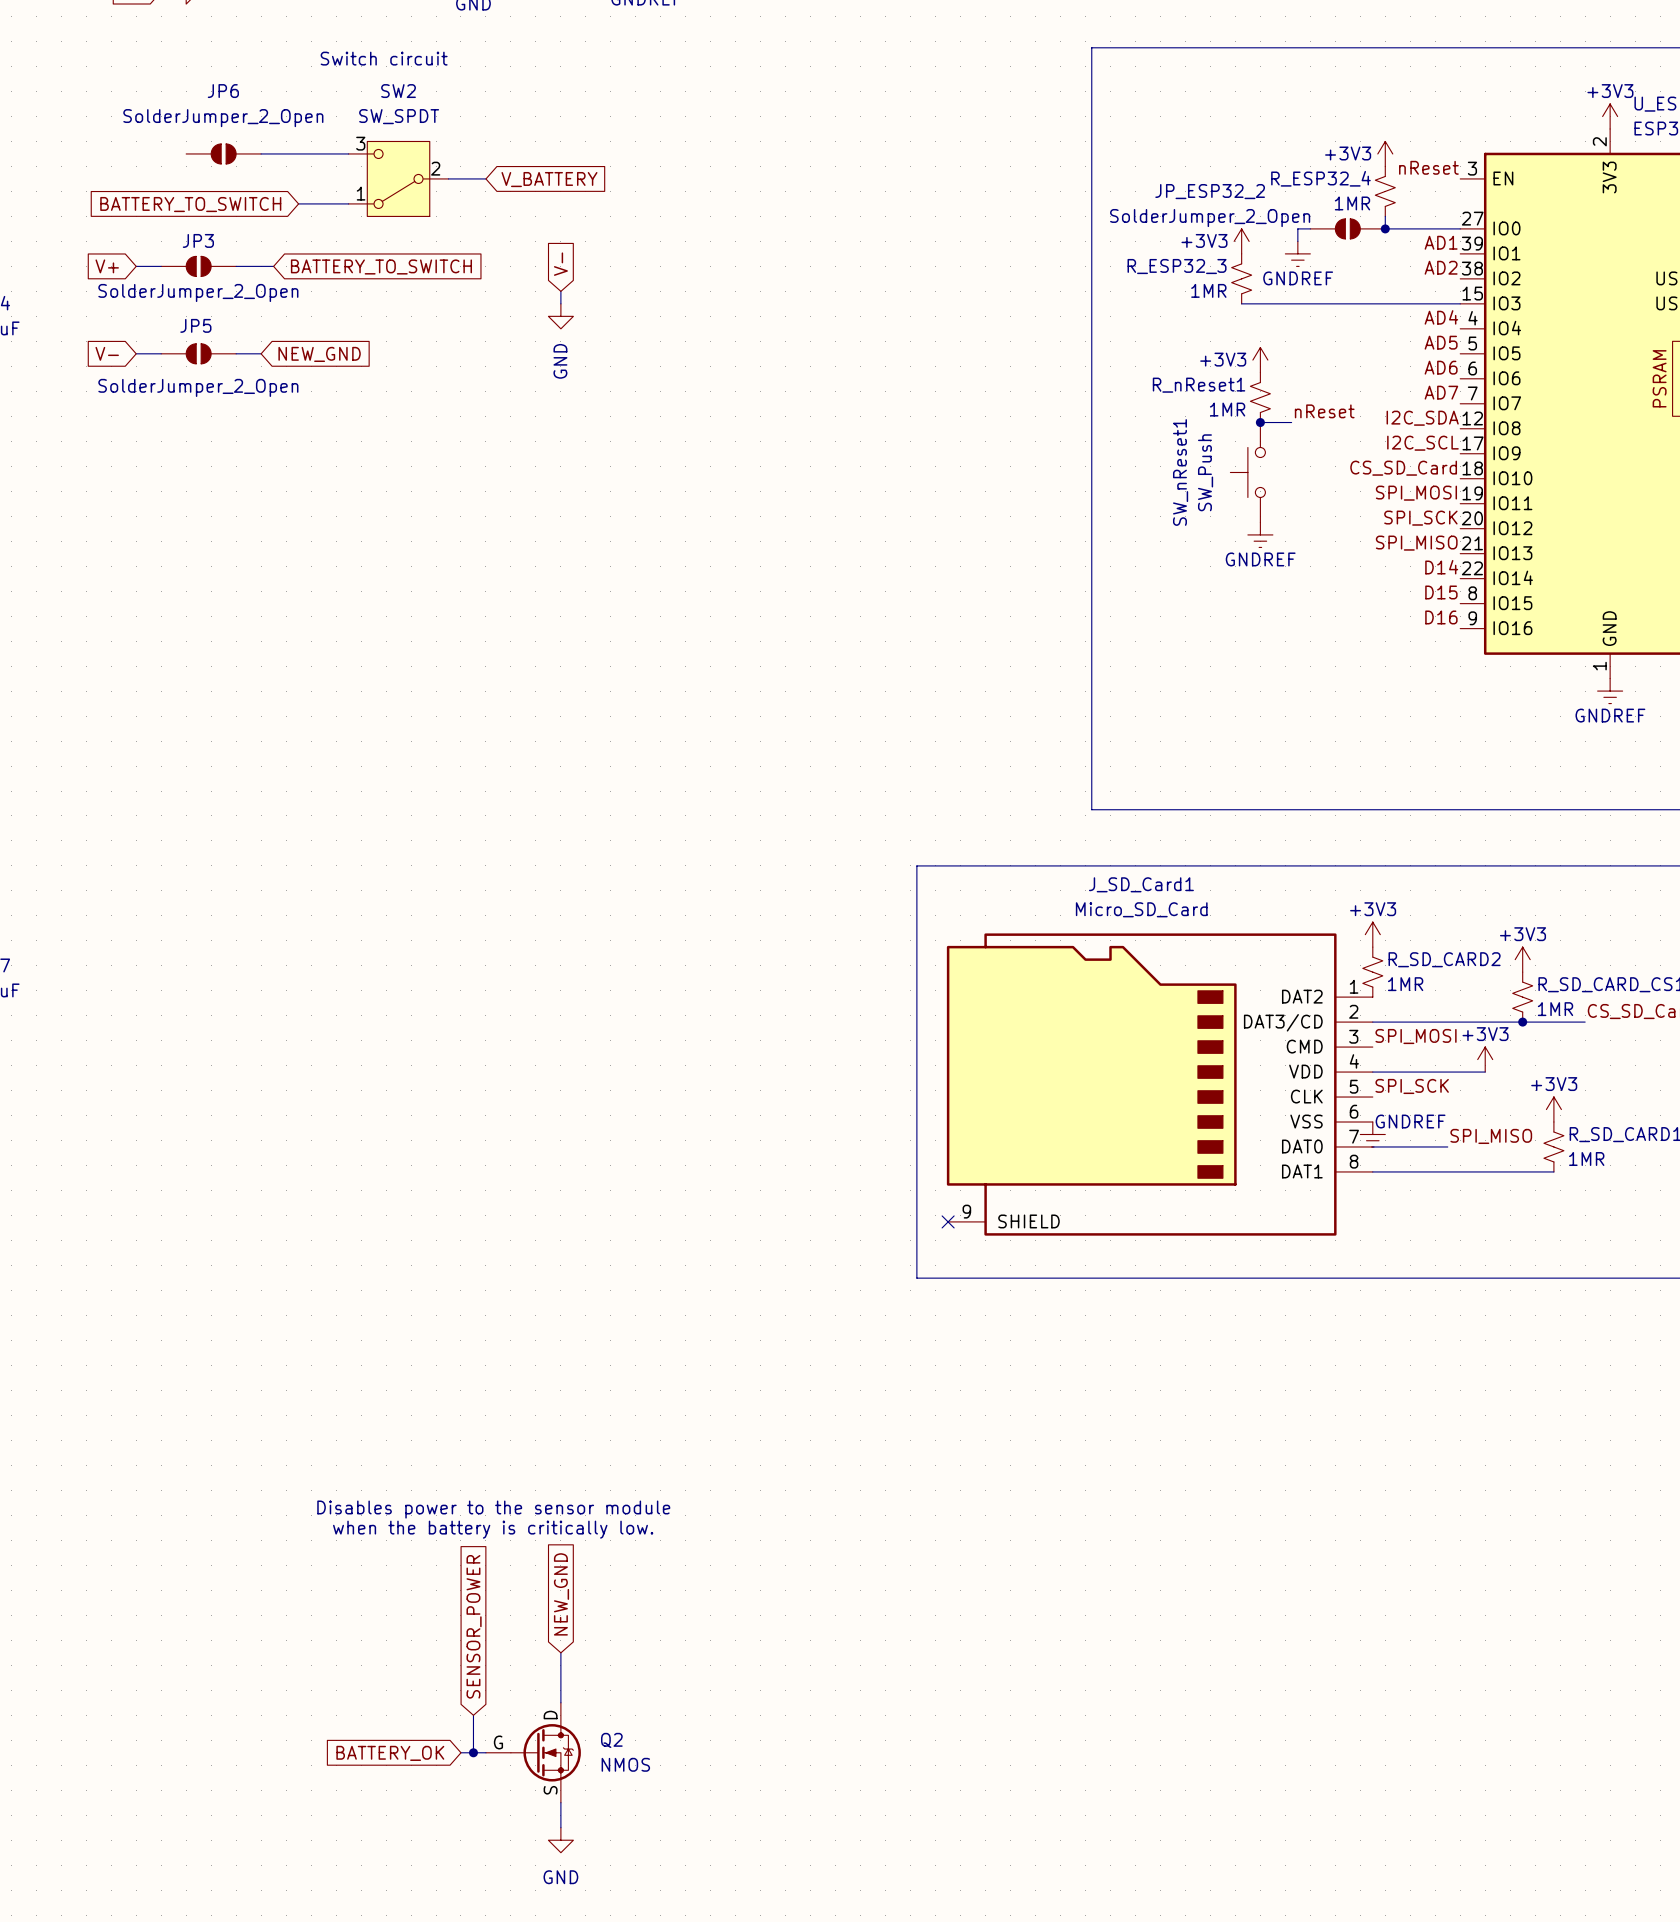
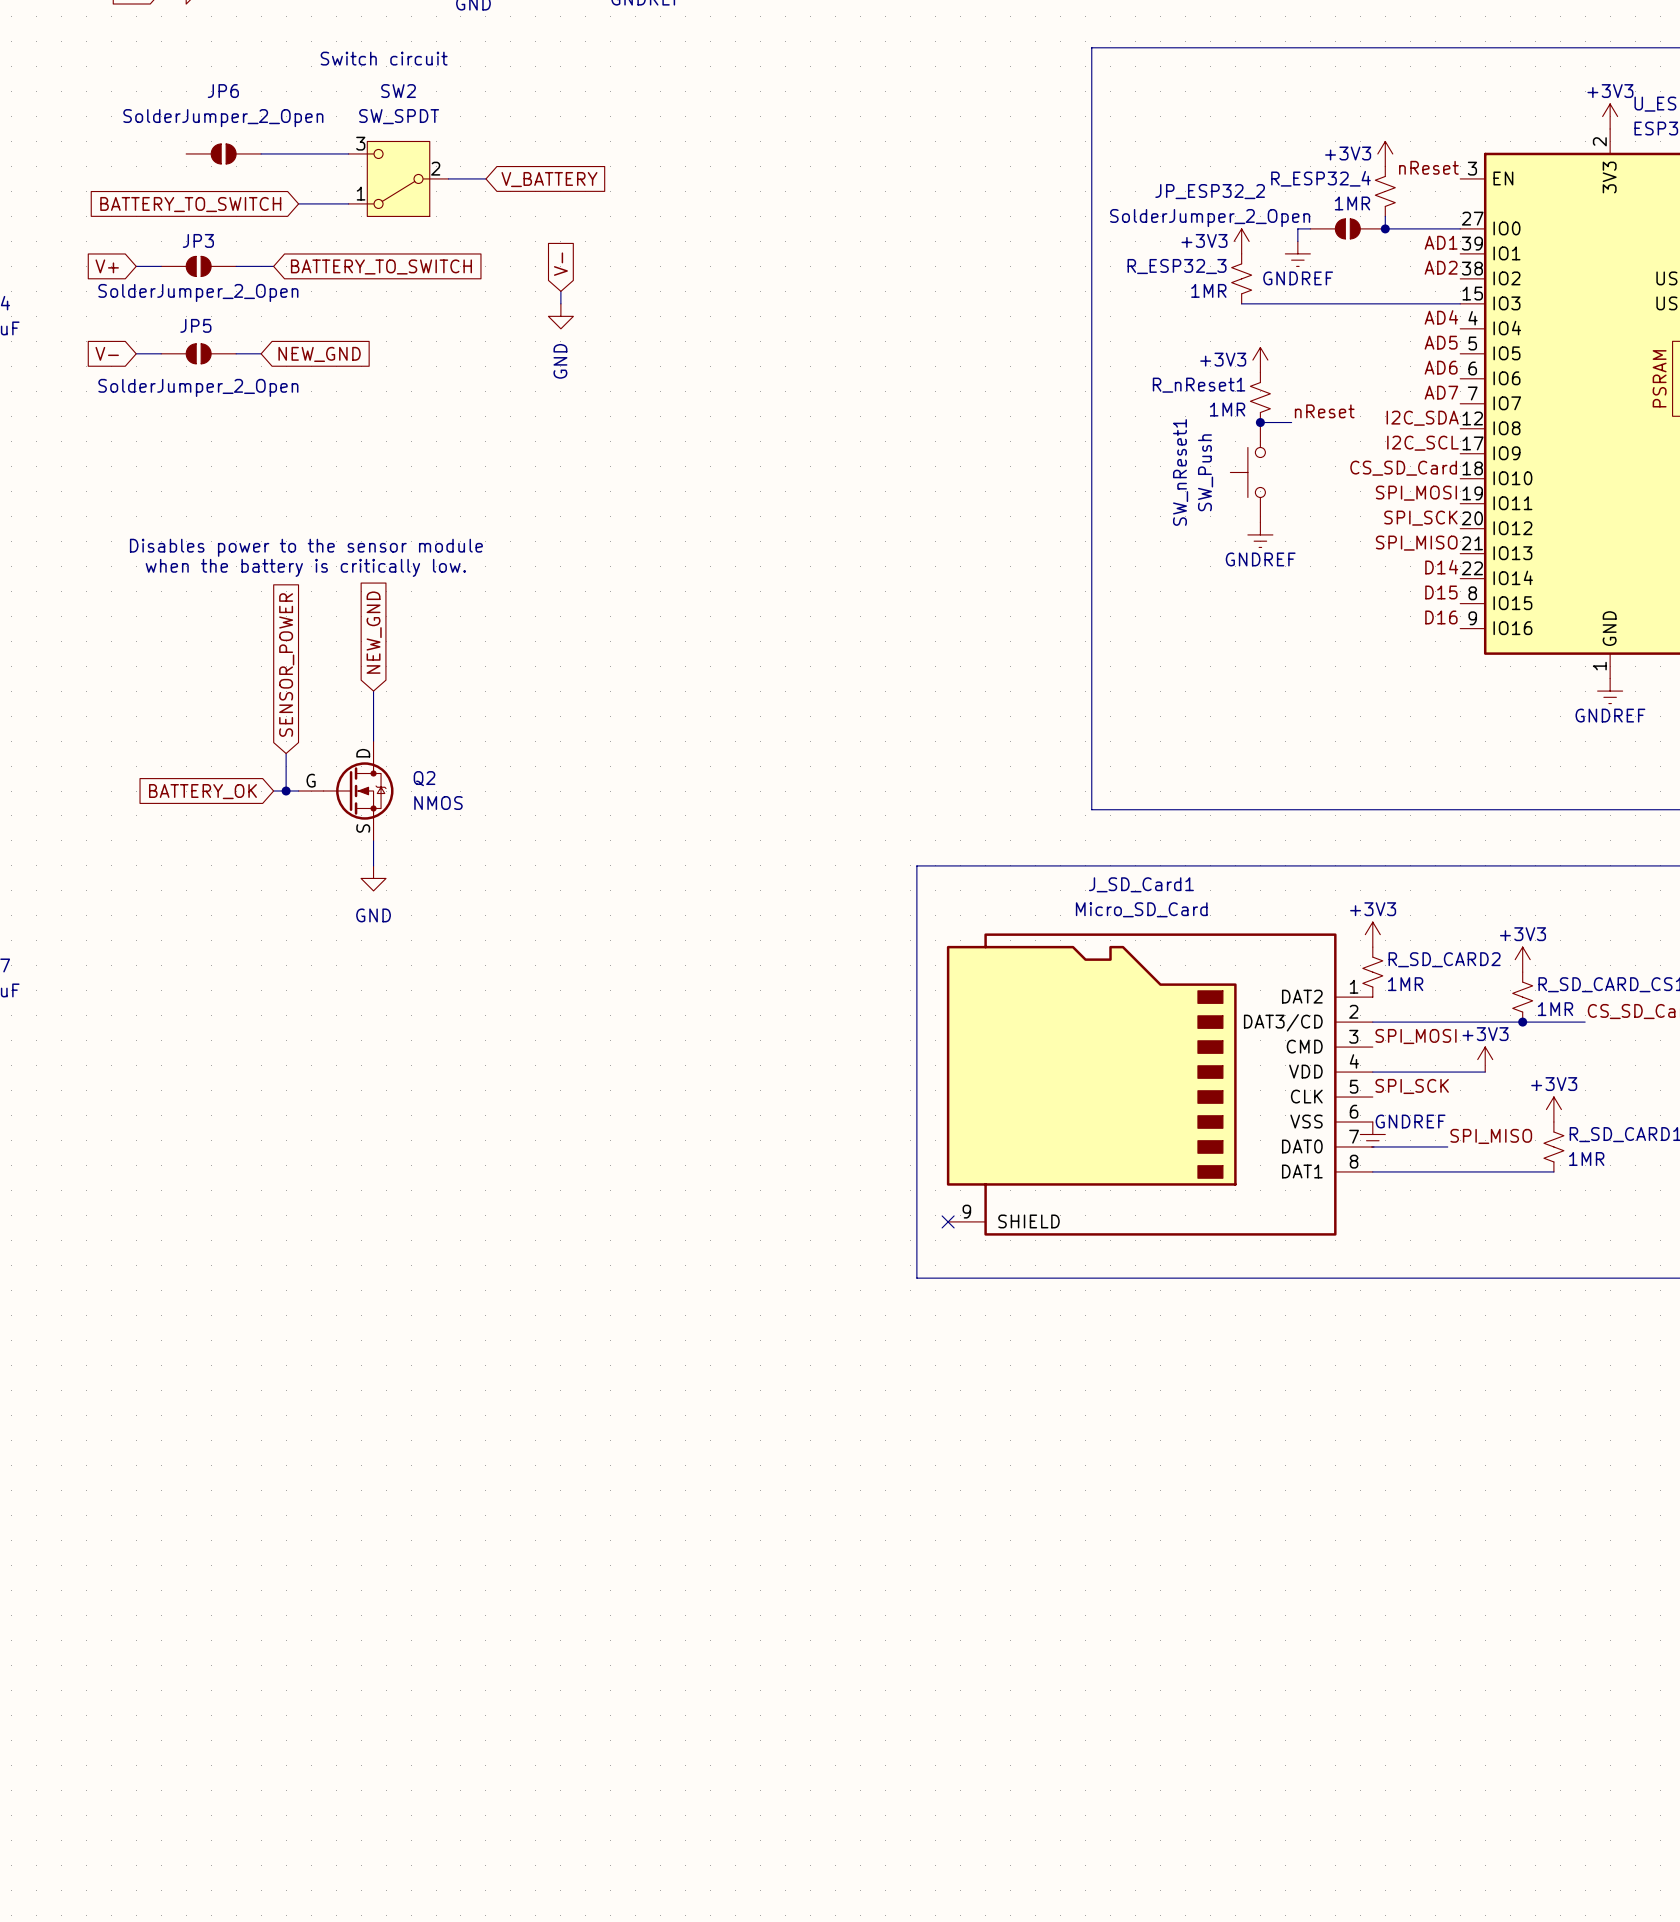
text: none -> Disables power to the sensor module (306, 547)
text: none -> when the battery is critically low. (305, 567)
global label: none -> NEW_GND (374, 632)
global label: none -> SENSOR_POWER (286, 665)
wire: none -> (373, 691) (373, 741)
wire: none -> (286, 753) (286, 791)
global label: none -> BATTERY_OK (202, 791)
wire: none -> (273, 791) (298, 791)
junction: none -> (286, 791)
wire: none -> (373, 840) (373, 865)
power symbol: none -> GND (373, 878)
text: Disables power to the sensor module (493, 1509) -> none
text: when the battery is critically low. (493, 1529) -> none
global label: NEW_GND (561, 1594) -> none
global label: SENSOR_POWER (474, 1626) -> none
wire: (560, 1652) (560, 1702) -> none
wire: (473, 1715) (473, 1752) -> none
wire: (460, 1752) (485, 1752) -> none
junction: (473, 1752) -> none
Q2 position: (533, 1752) -> (346, 791)
global label: BATTERY_OK (390, 1753) -> none
wire: (560, 1802) (560, 1827) -> none
power symbol: GND (560, 1840) -> none

